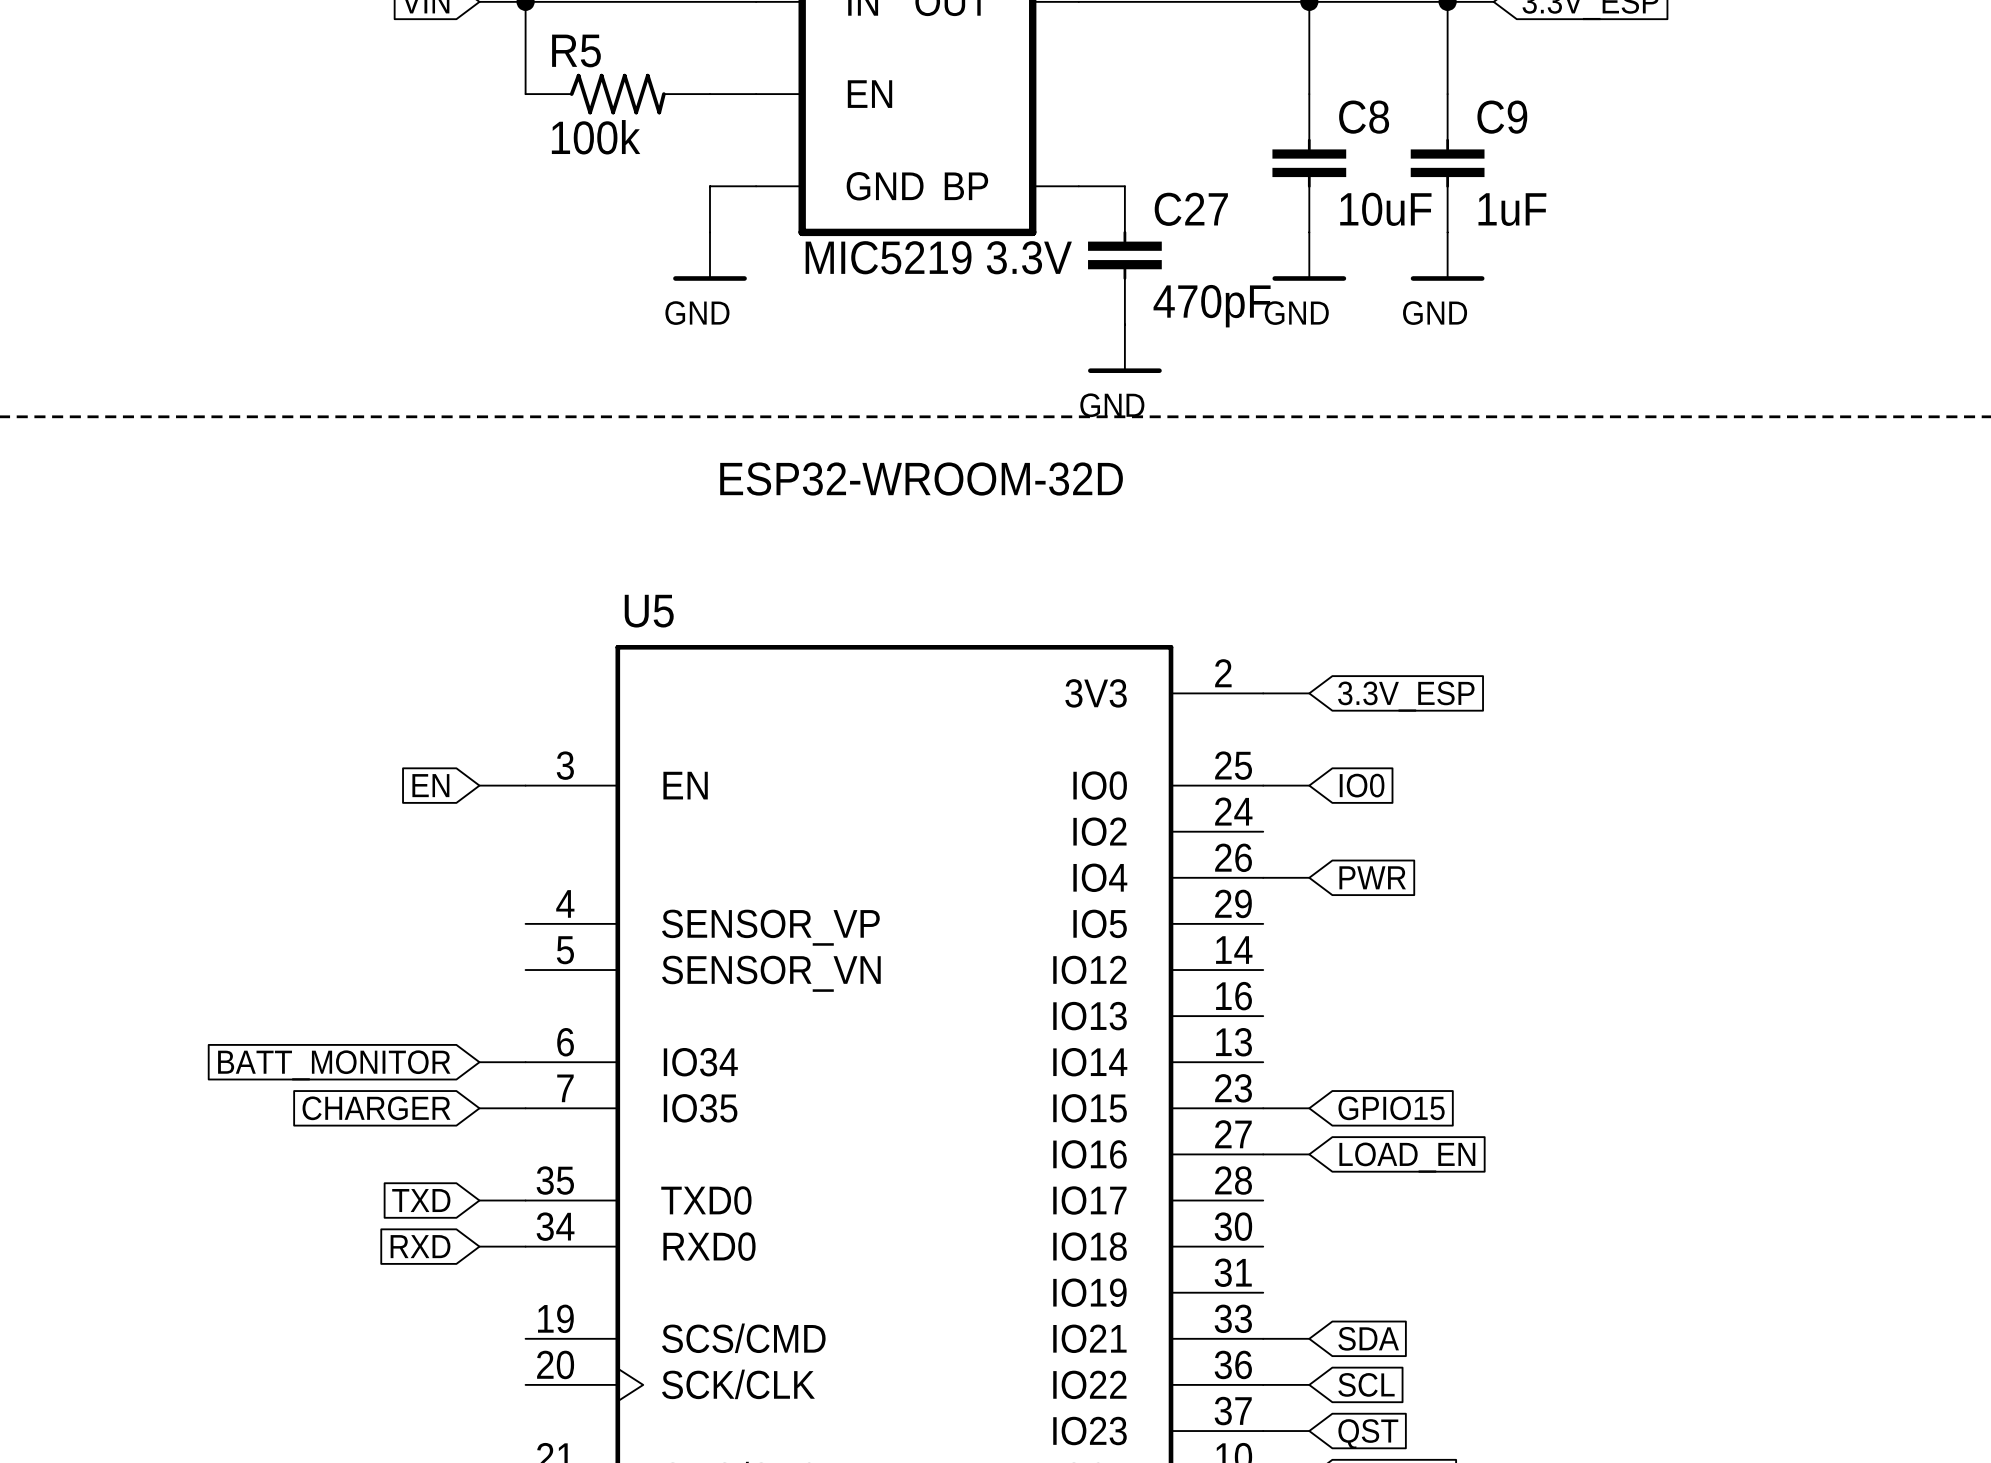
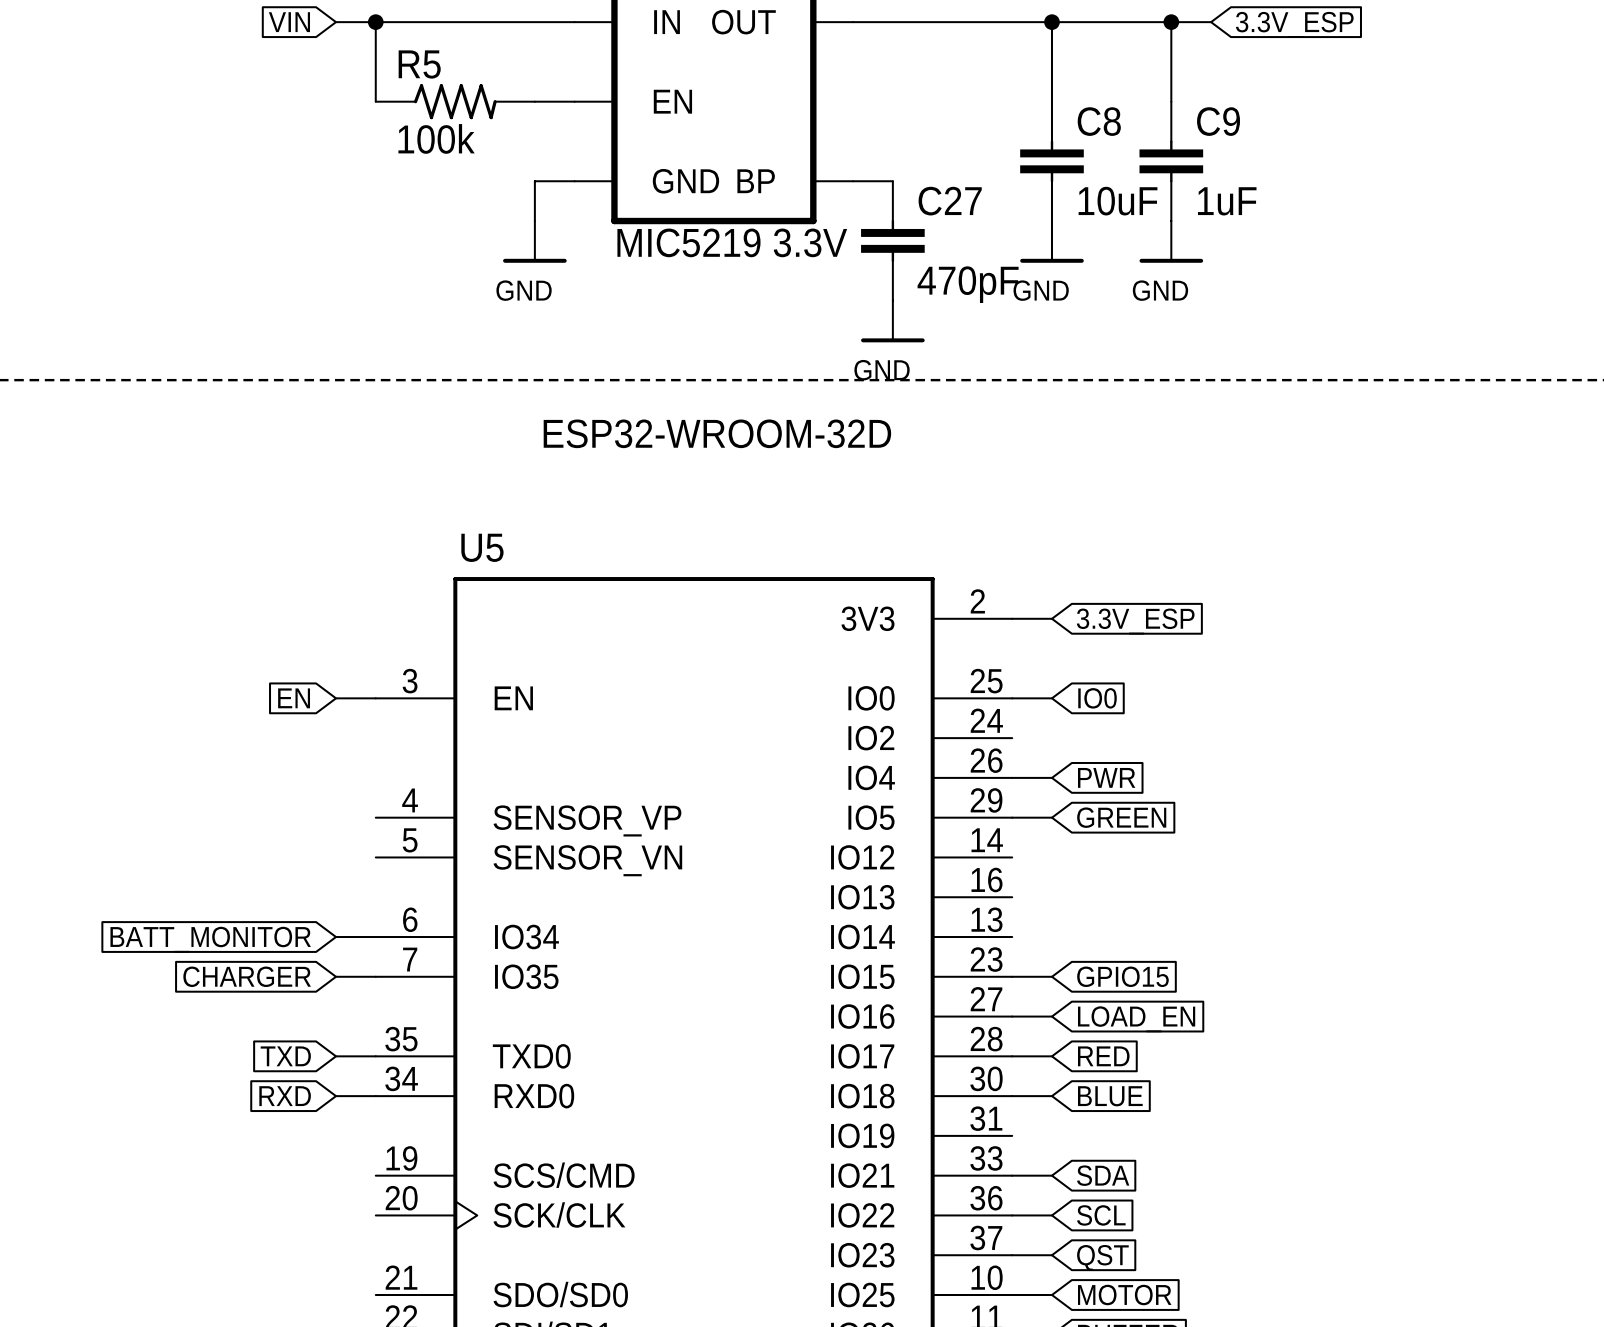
wire: none -> (1012, 817) (1051, 817)
global label: none -> GREEN (1121, 817)
wire: none -> (1012, 1056) (1051, 1056)
global label: none -> RED (1103, 1056)
wire: none -> (1012, 1096) (1051, 1096)
global label: none -> BLUE (1110, 1096)

